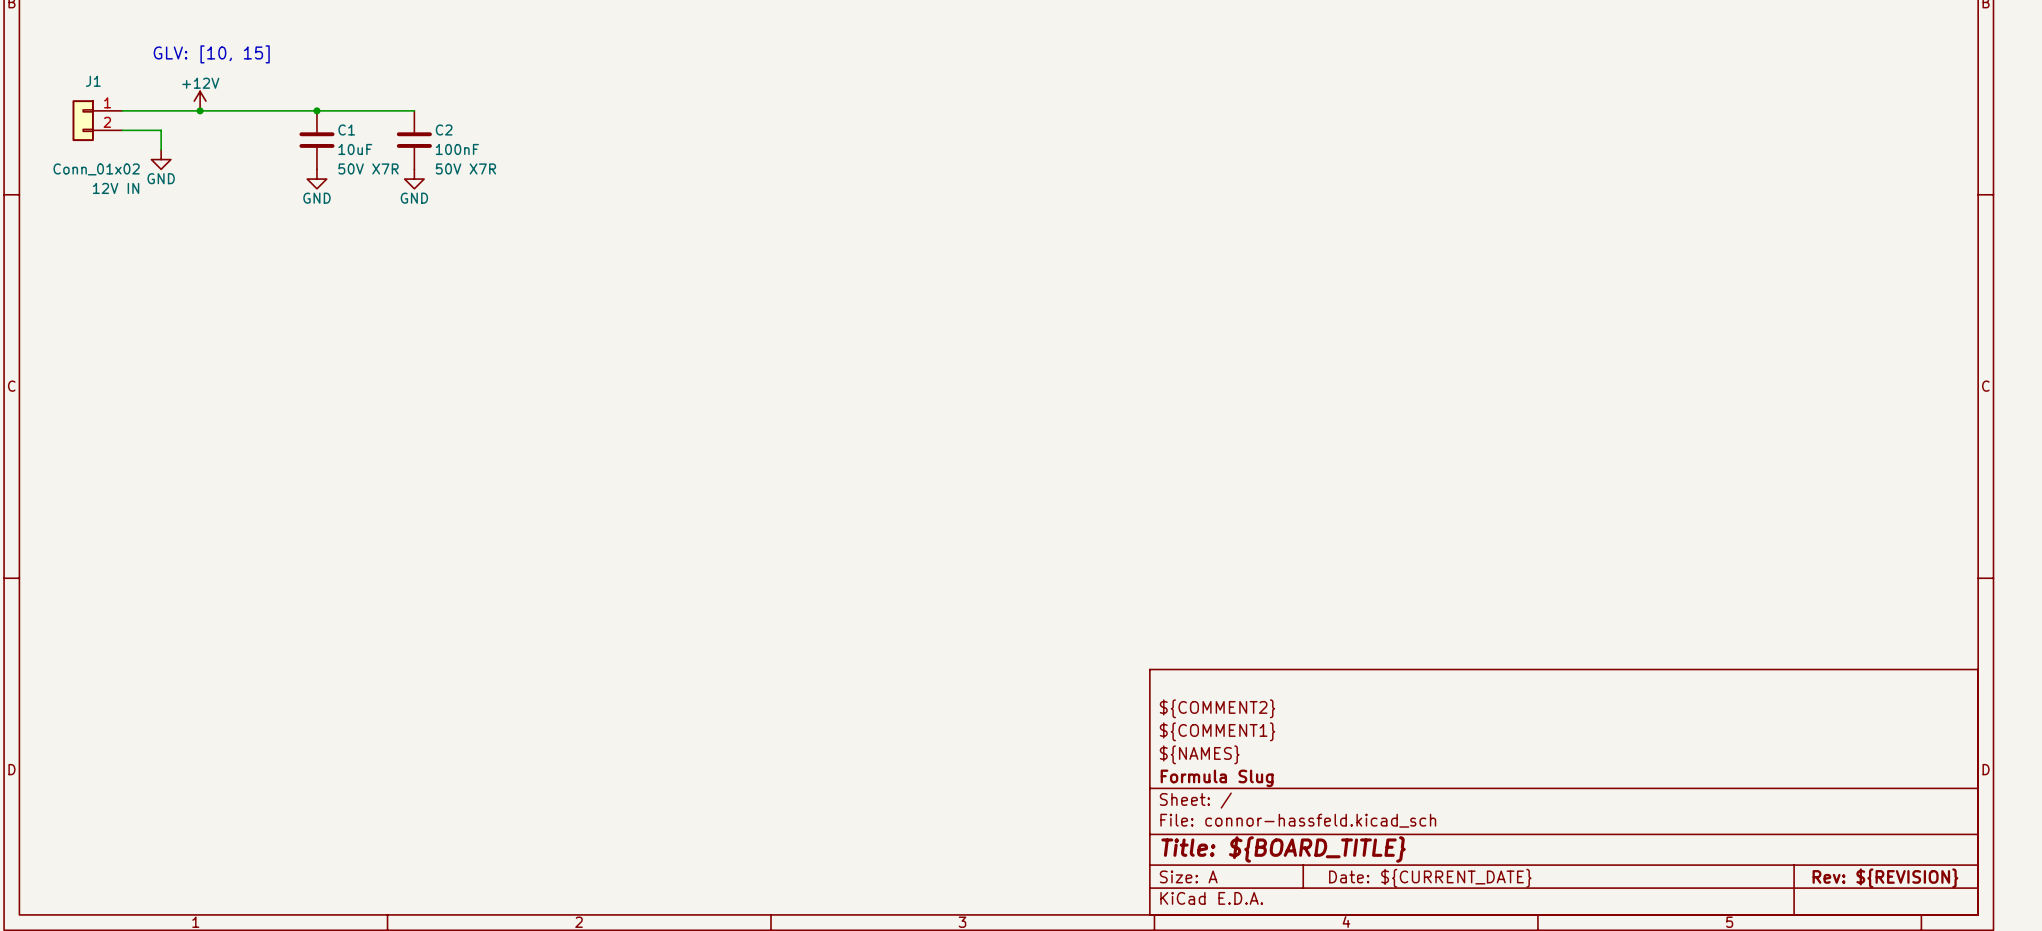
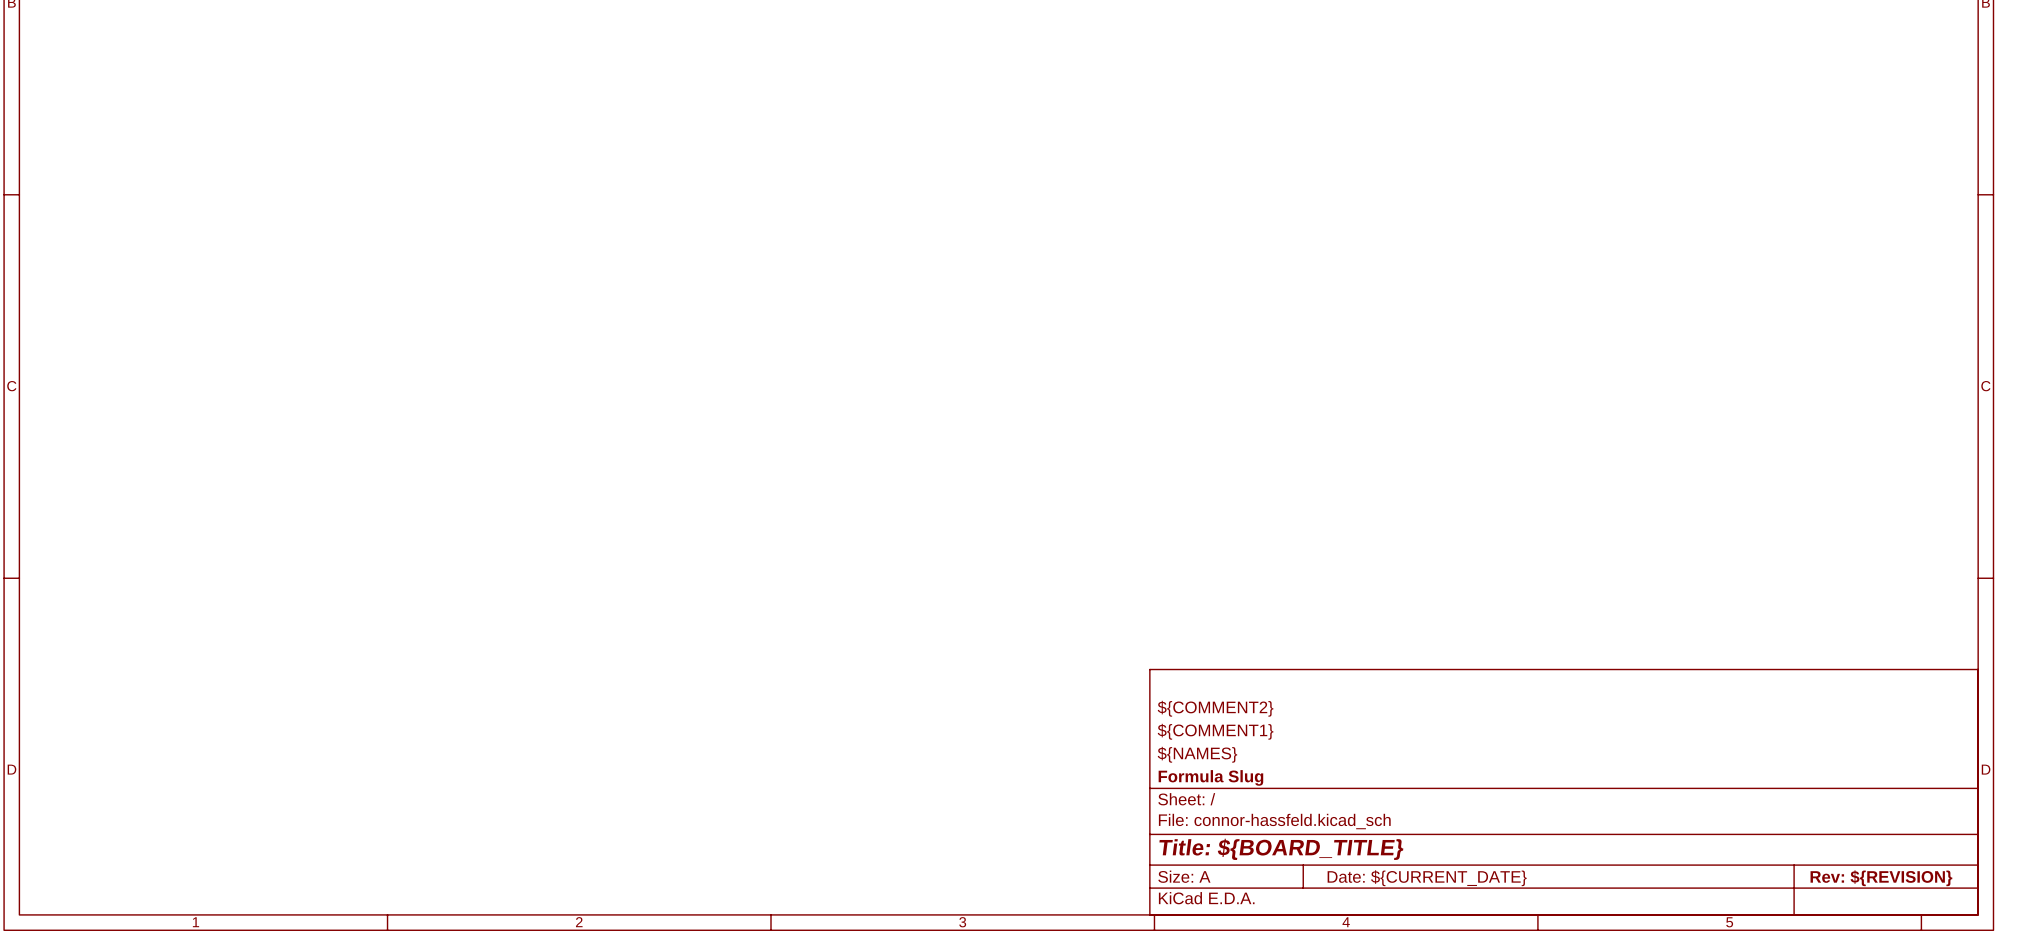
text: GLV: [10, 15] (211, 54) -> none
power symbol: +12V (200, 101) -> none
wire: (122, 110) (414, 110) -> none
junction: (200, 110) -> none
junction: (316, 110) -> none
J1: Conn_01x02 (97, 120) -> none
wire: (122, 130) (161, 130) (161, 149) -> none
C1: 10uF (316, 140) -> none
C2: 100nF (414, 140) -> none
power symbol: GND (161, 159) -> none
power symbol: GND (316, 179) -> none
power symbol: GND (414, 179) -> none

